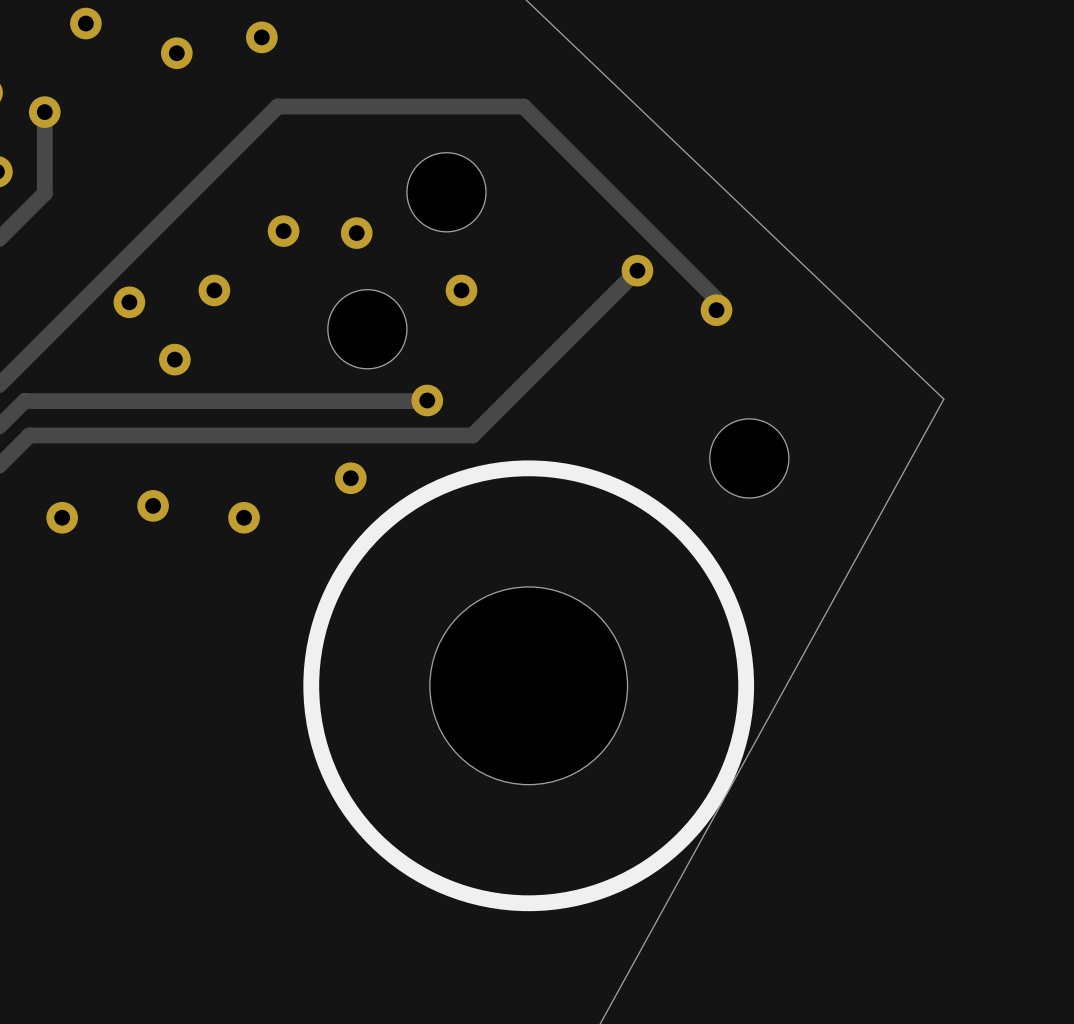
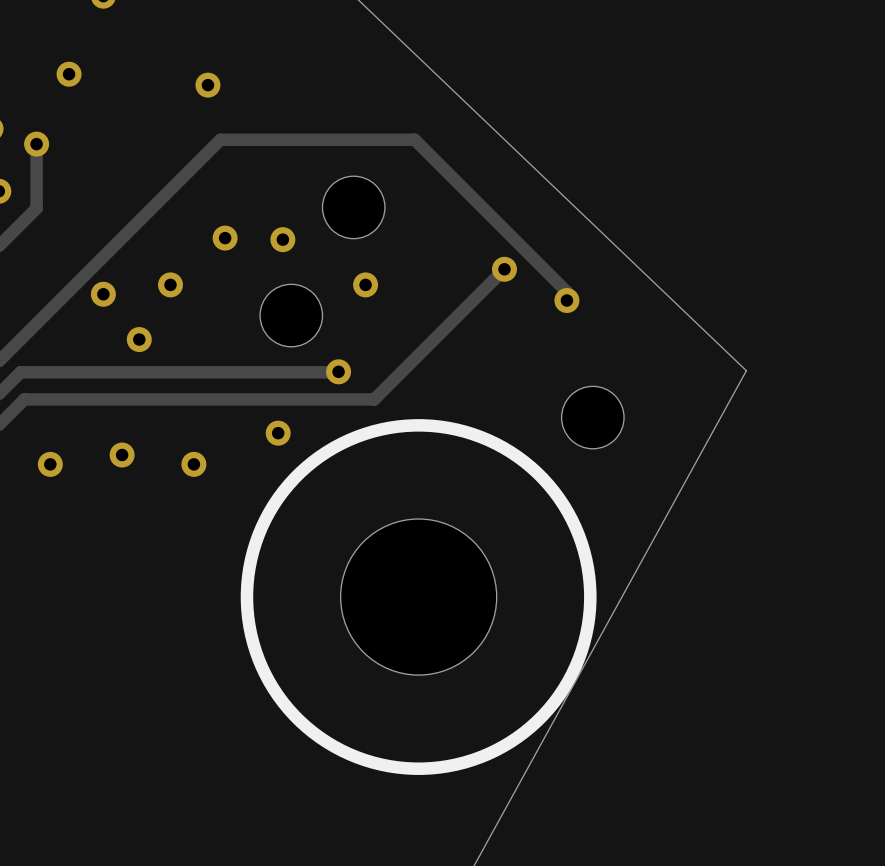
via: (176, 53) -> none

